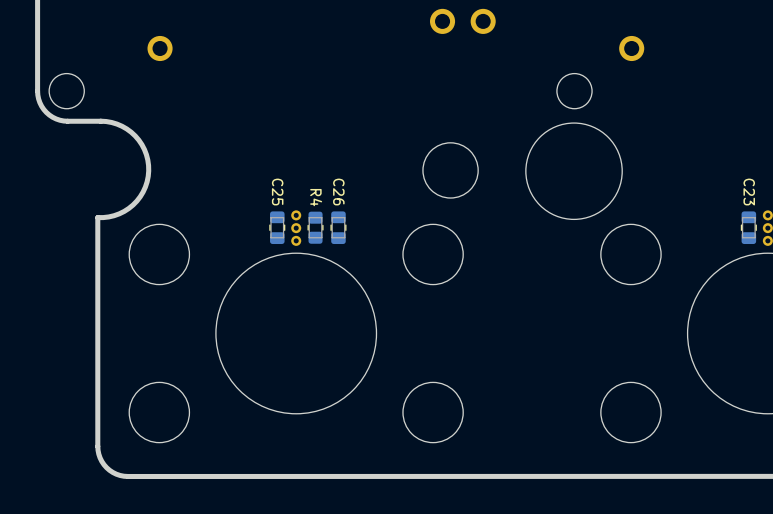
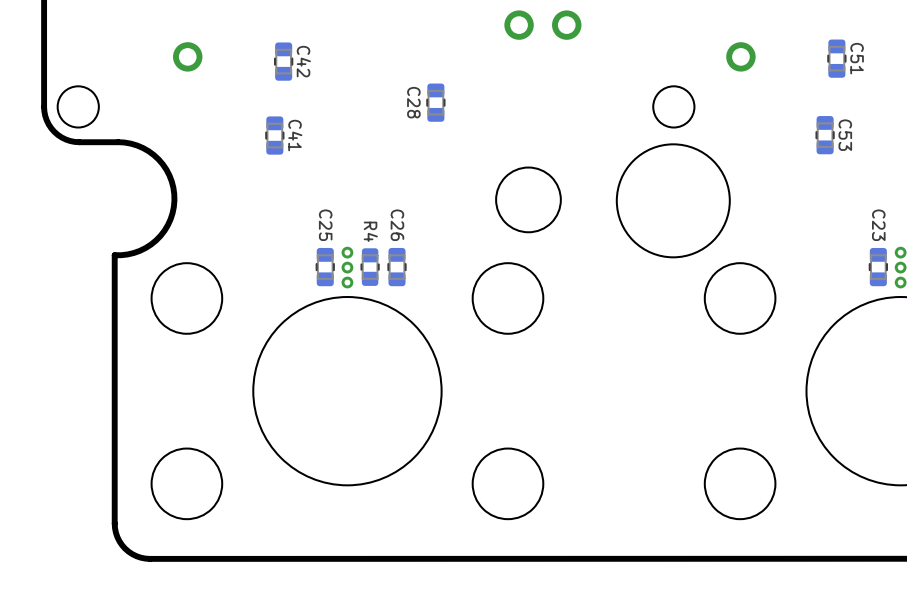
C51: none -> (836, 58)
C42: none -> (283, 61)
C28: none -> (435, 102)
C41: none -> (274, 135)
C53: none -> (825, 135)

